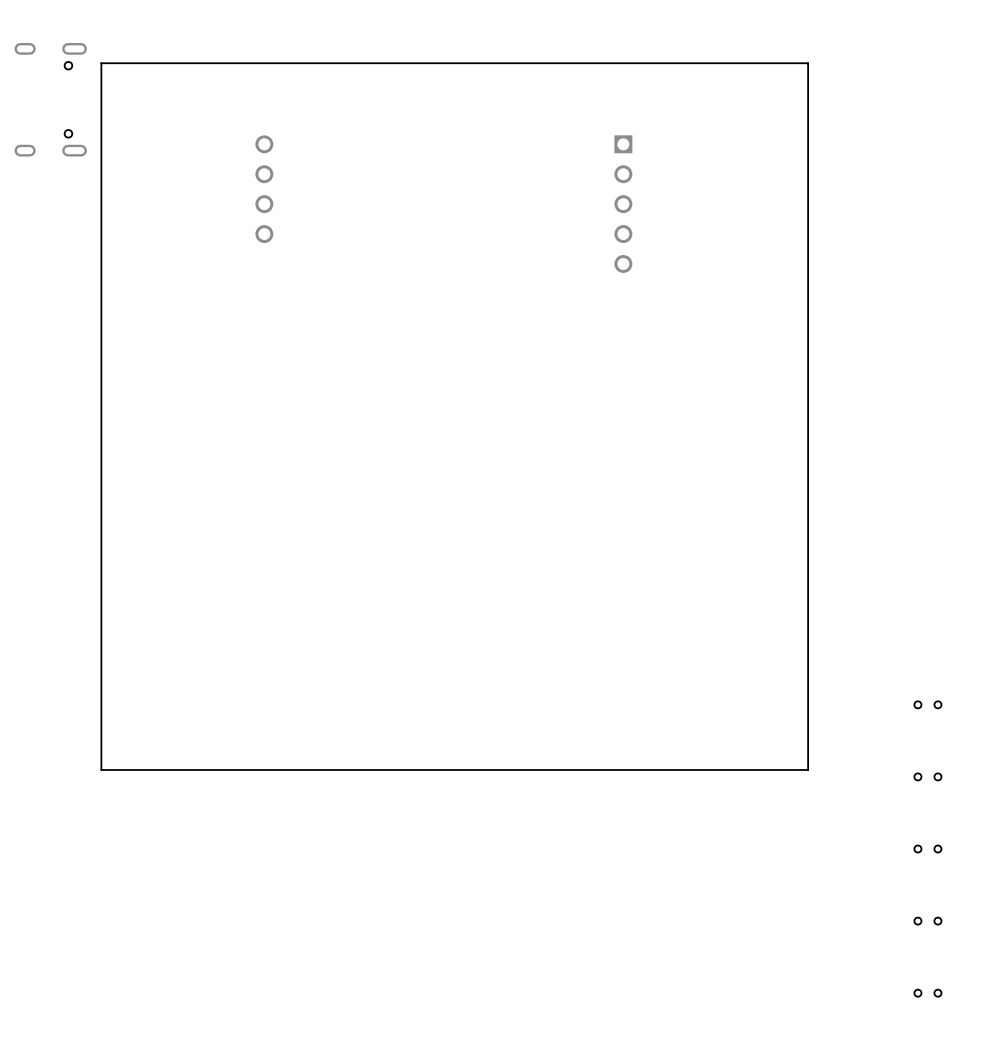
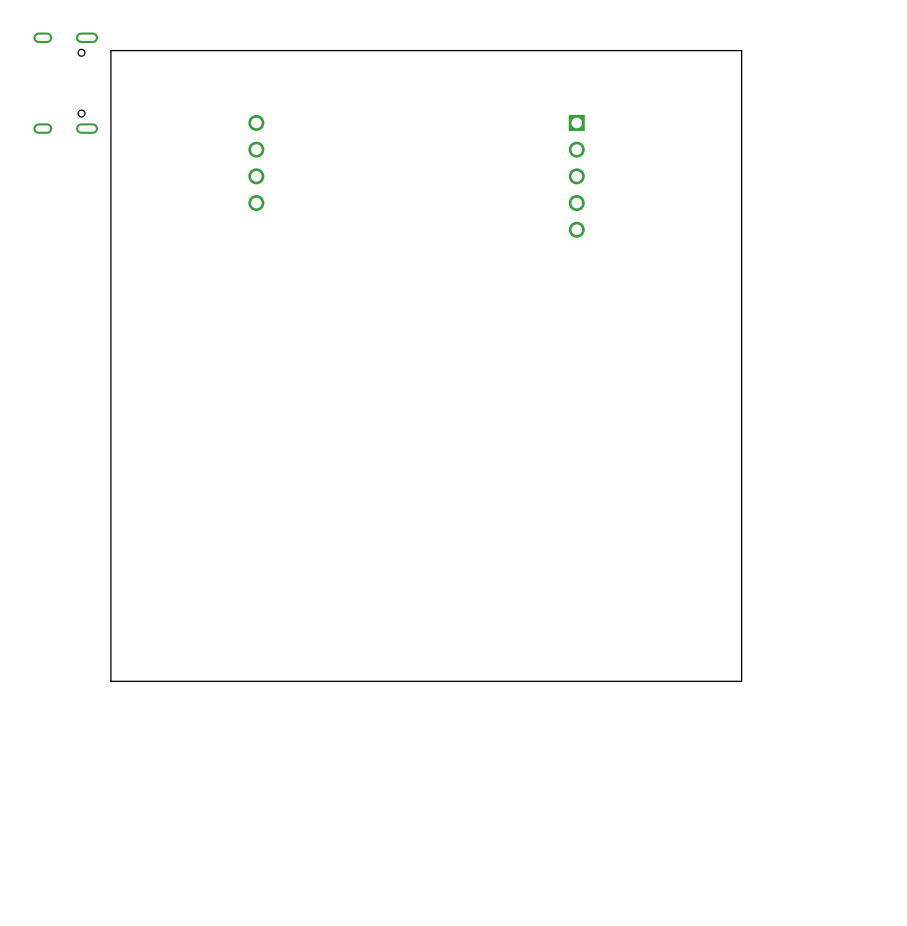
part: (927, 704) -> none
part: (927, 776) -> none
part: (927, 849) -> none
part: (927, 921) -> none
part: (927, 993) -> none

